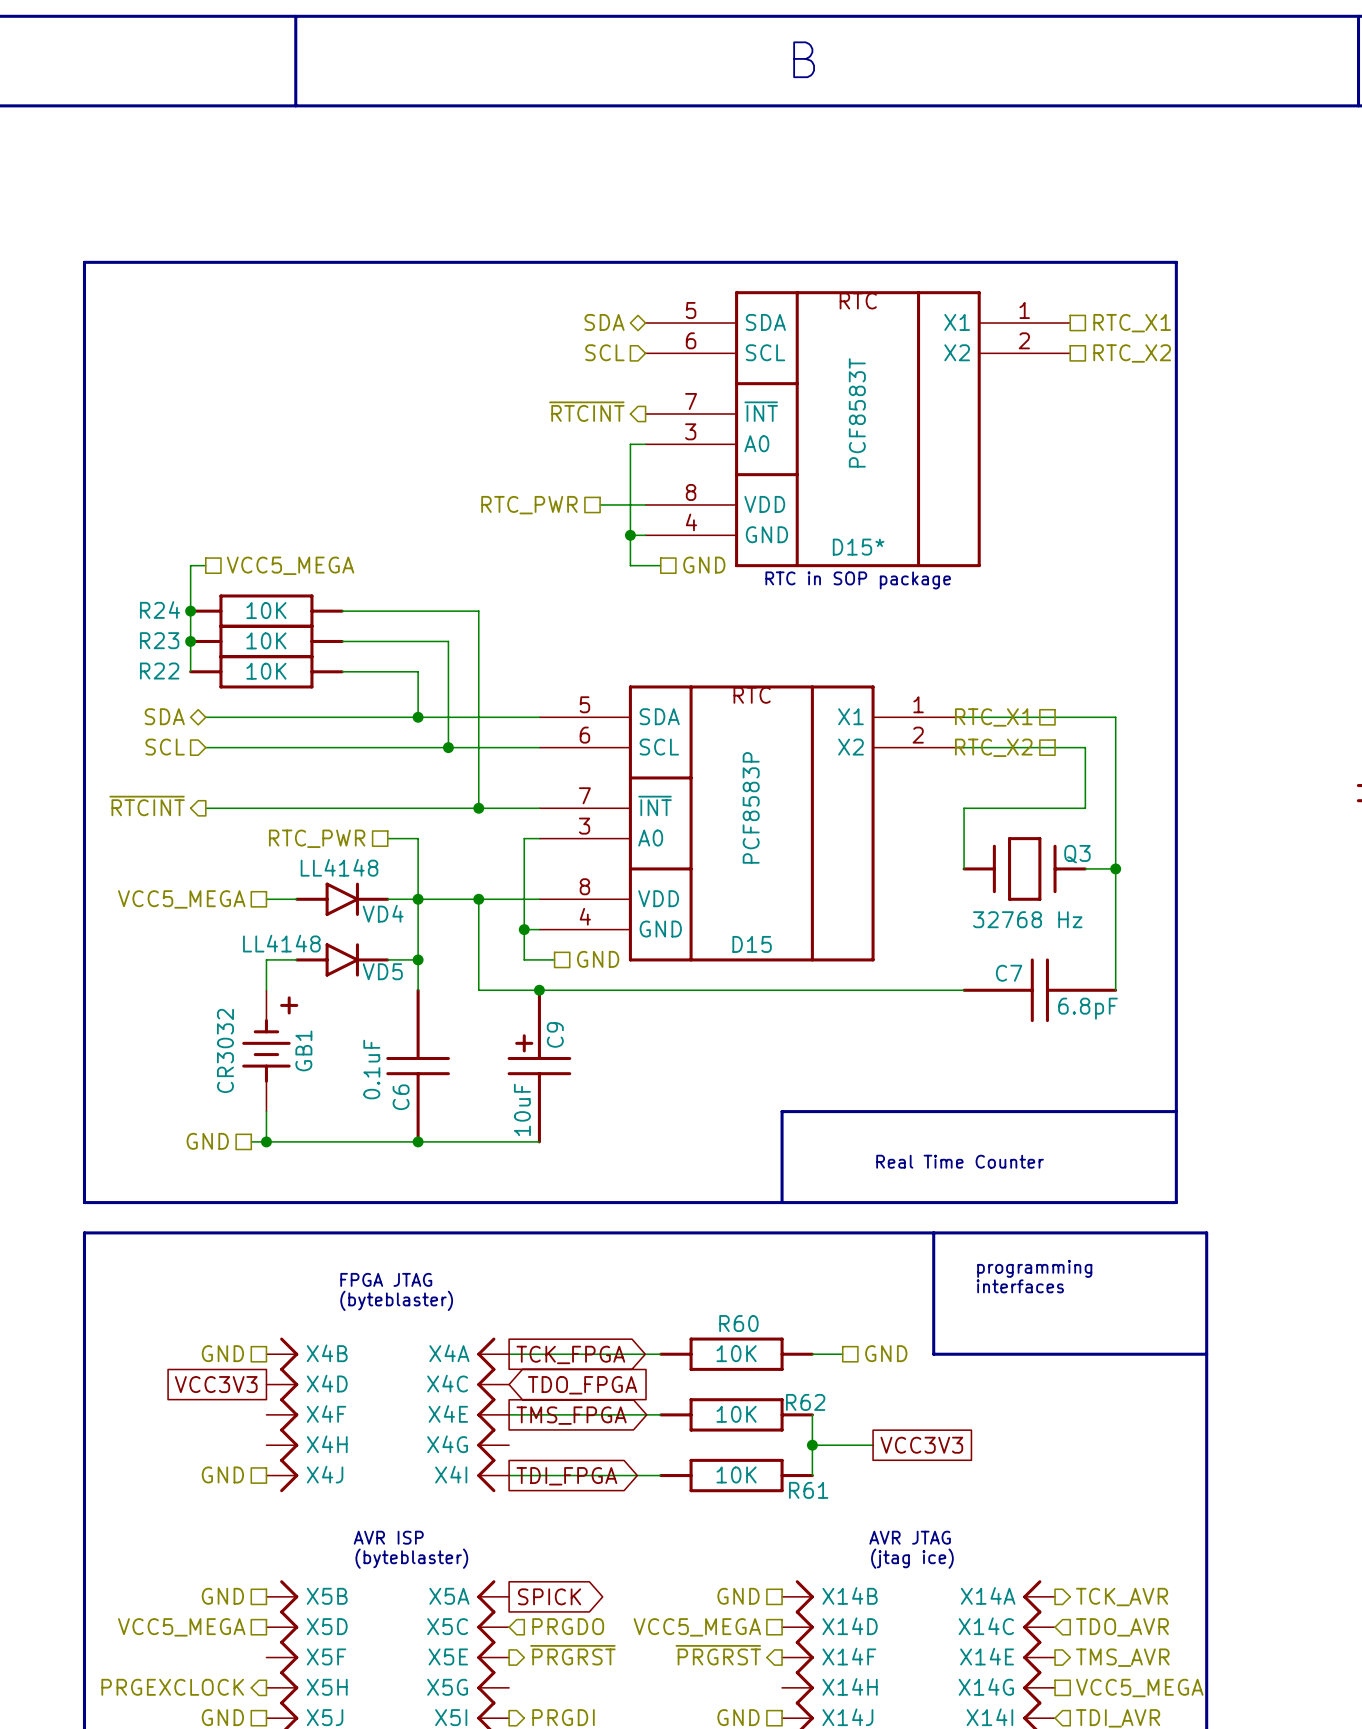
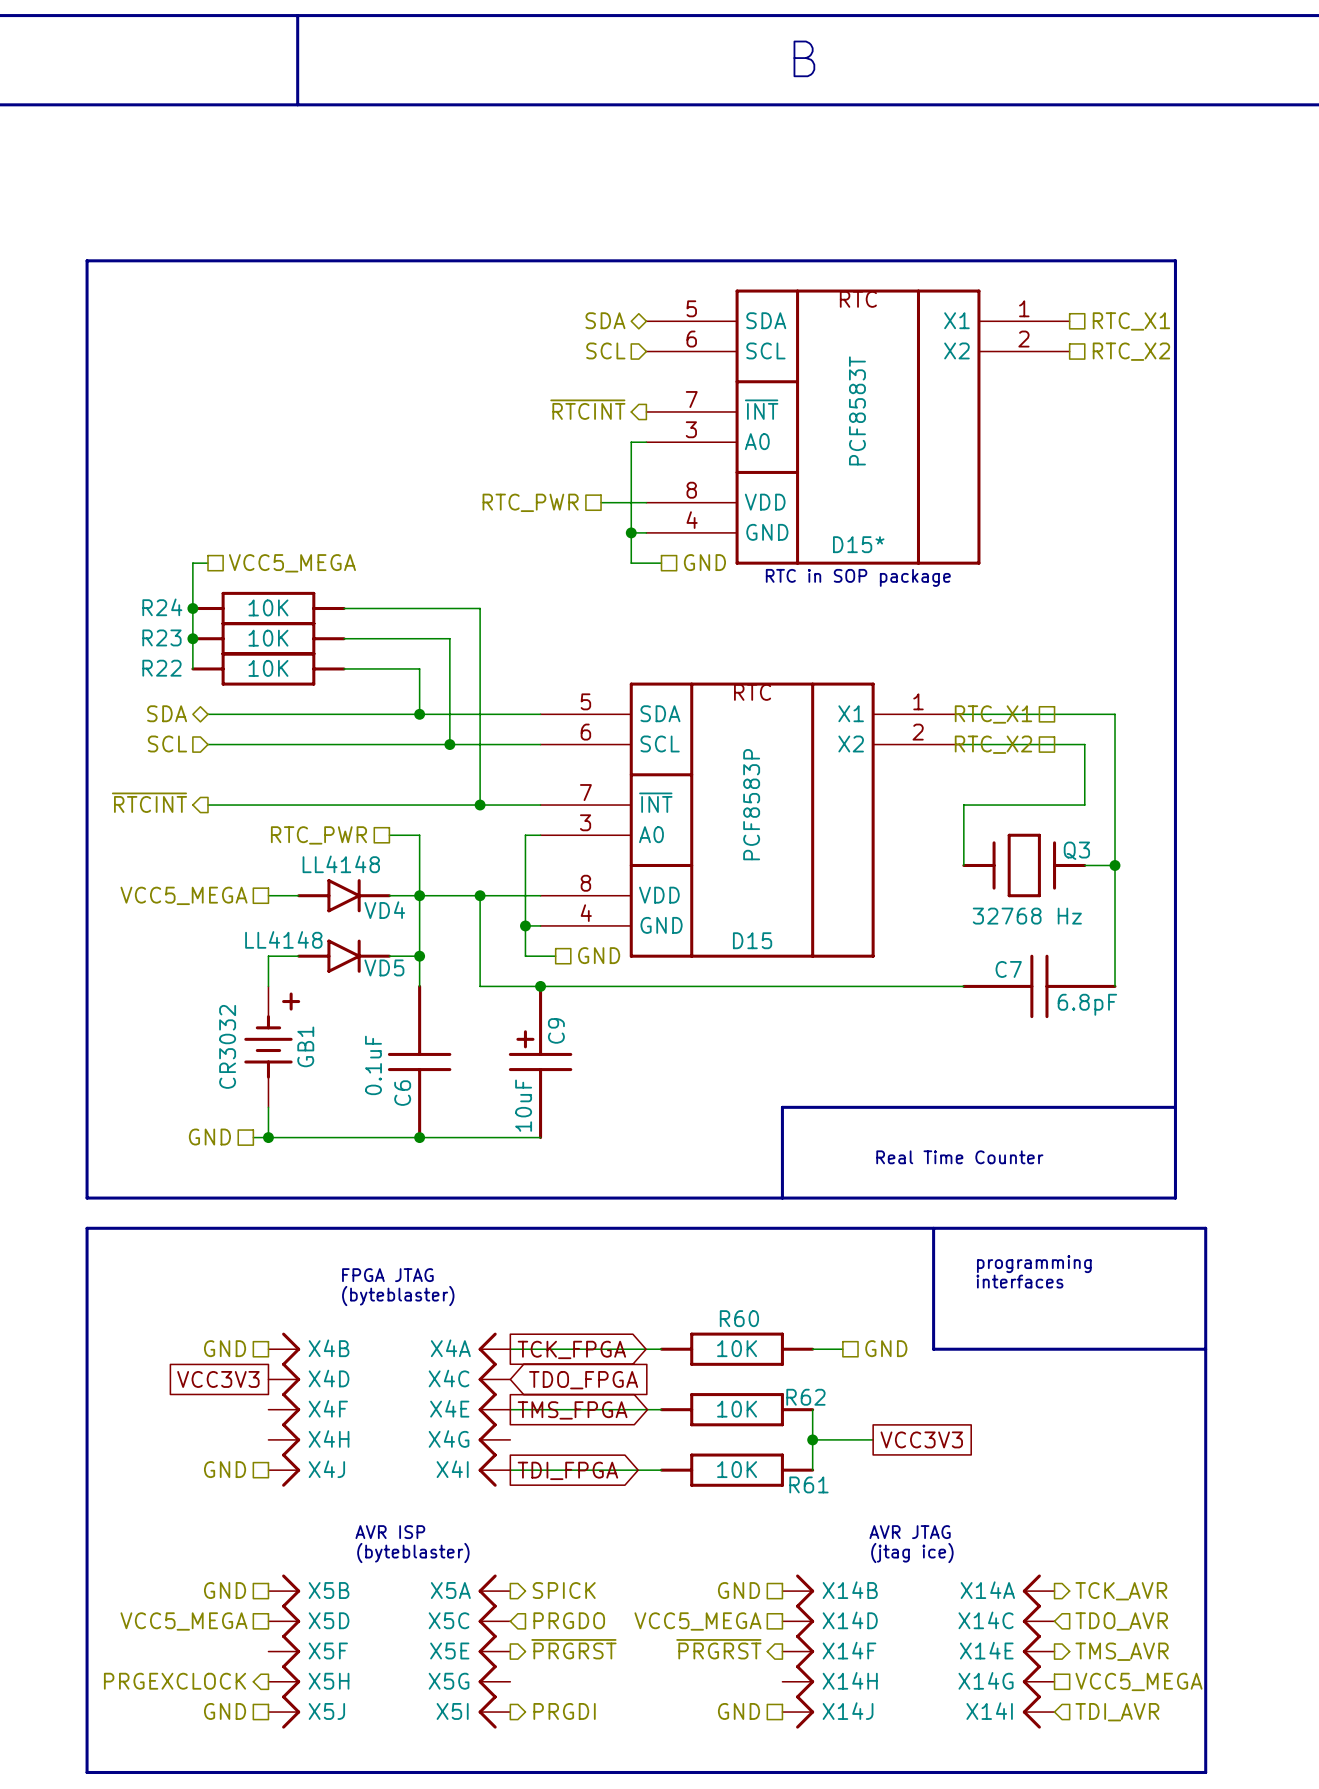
global label: SPICK (549, 1596) -> none
hierarchical label: none -> SPICK (564, 1590)

